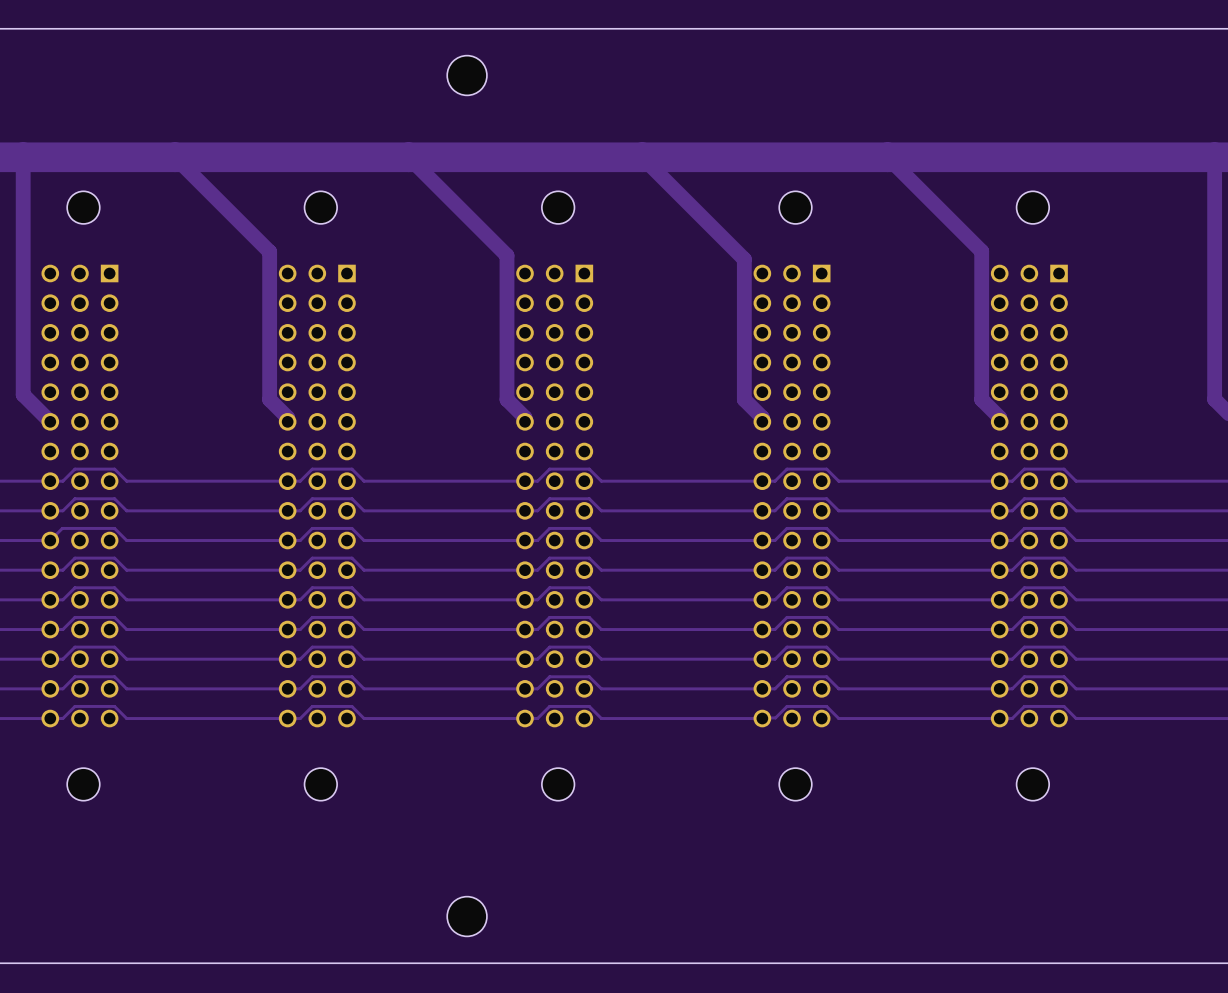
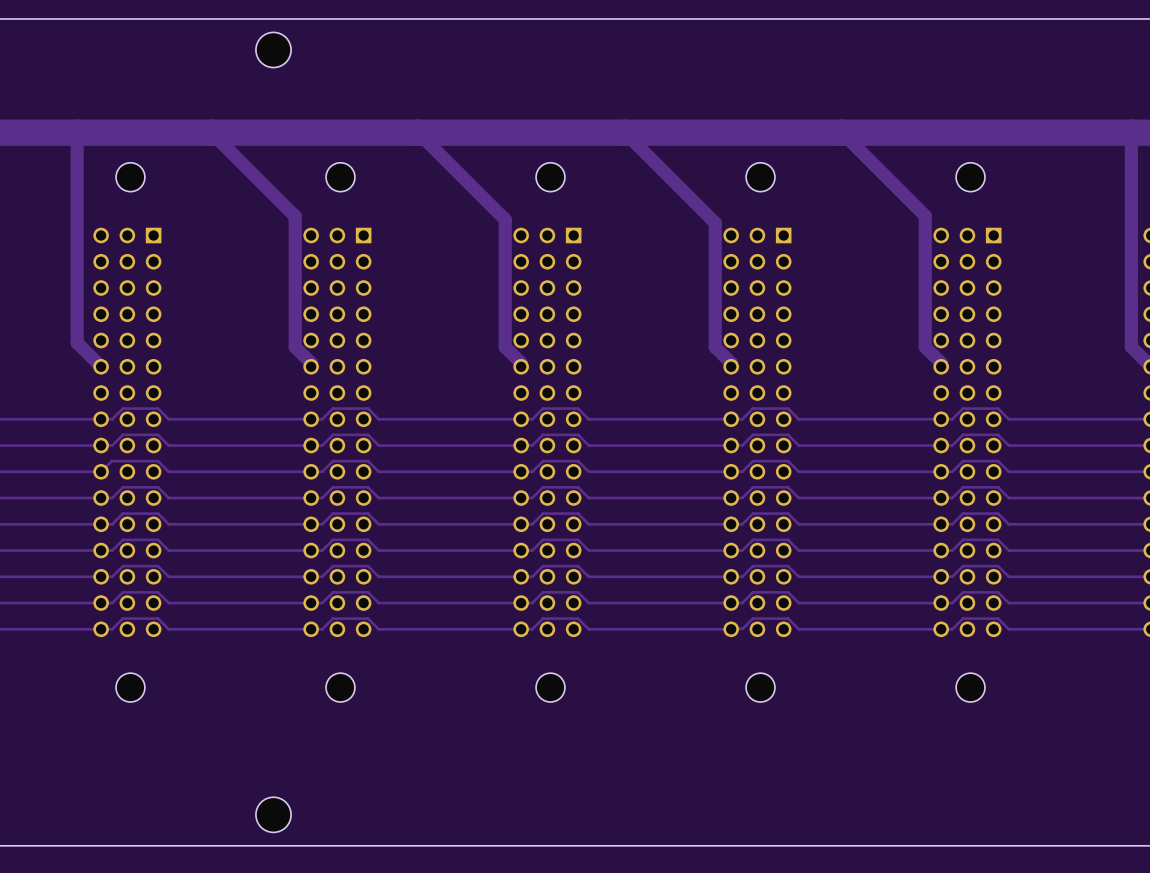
hole position: (467, 75) -> (273, 49)
hole position: (467, 916) -> (273, 814)

